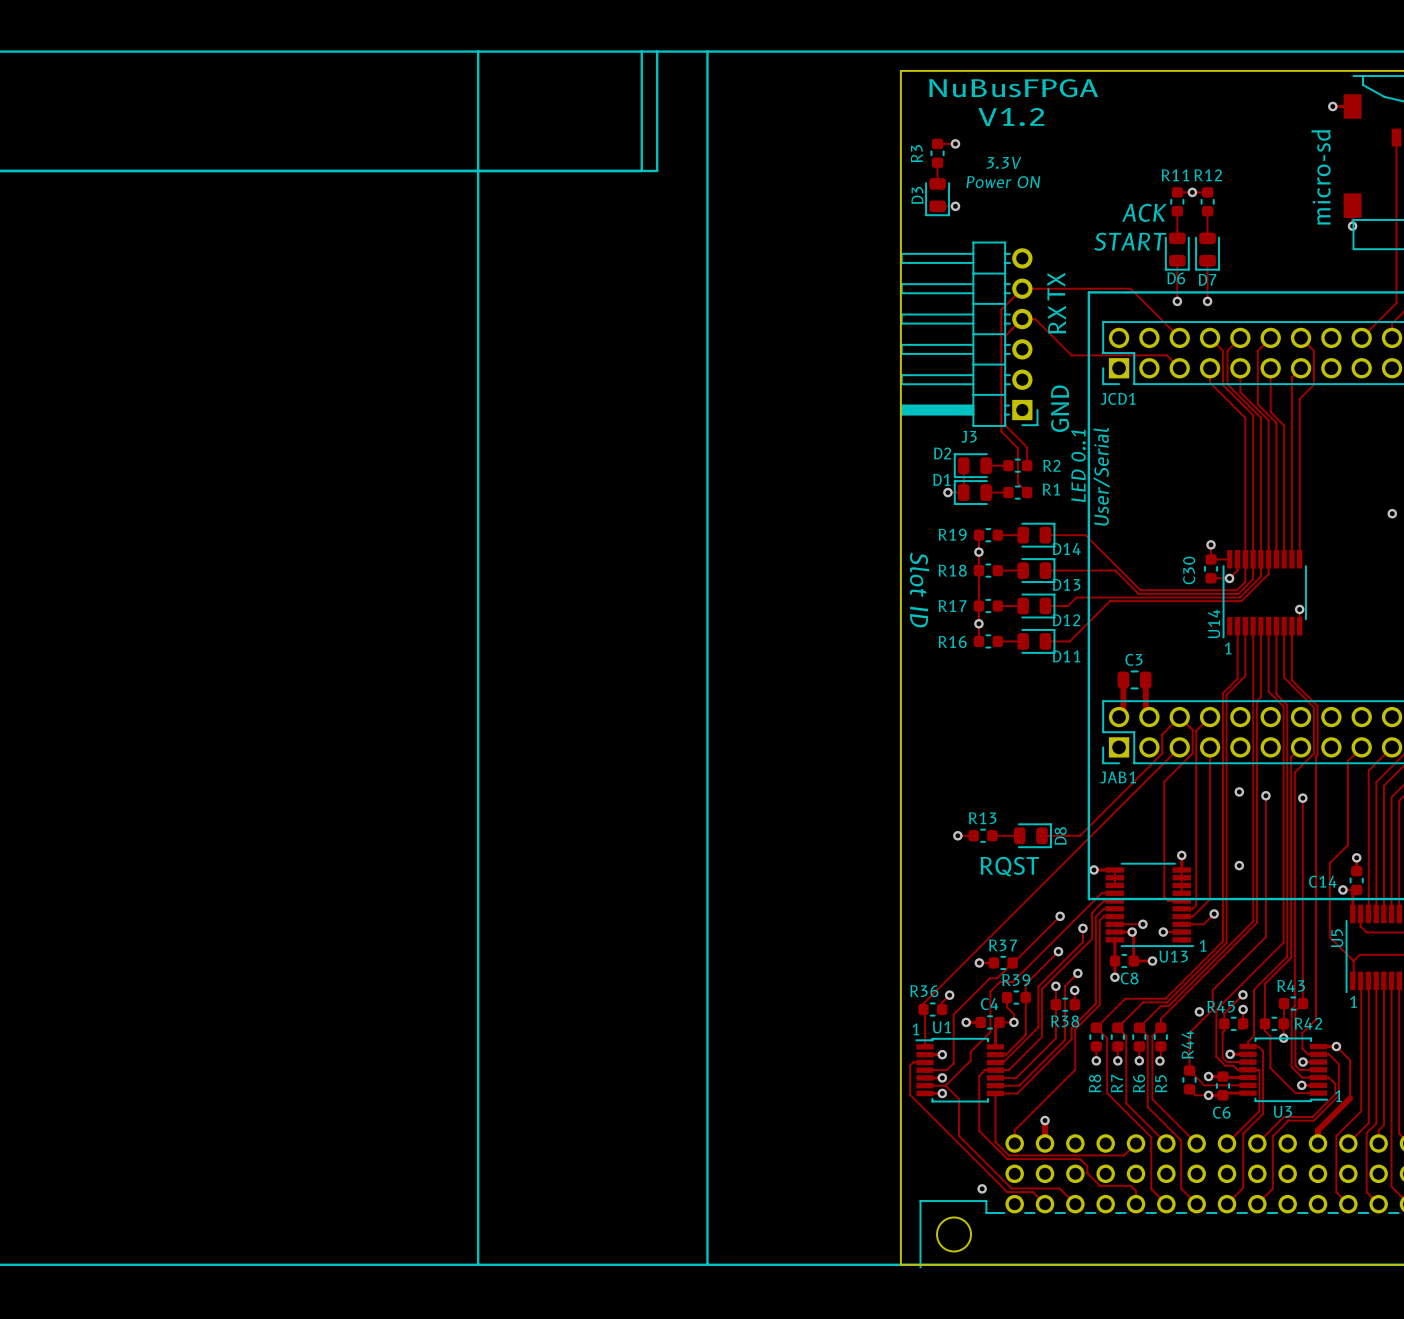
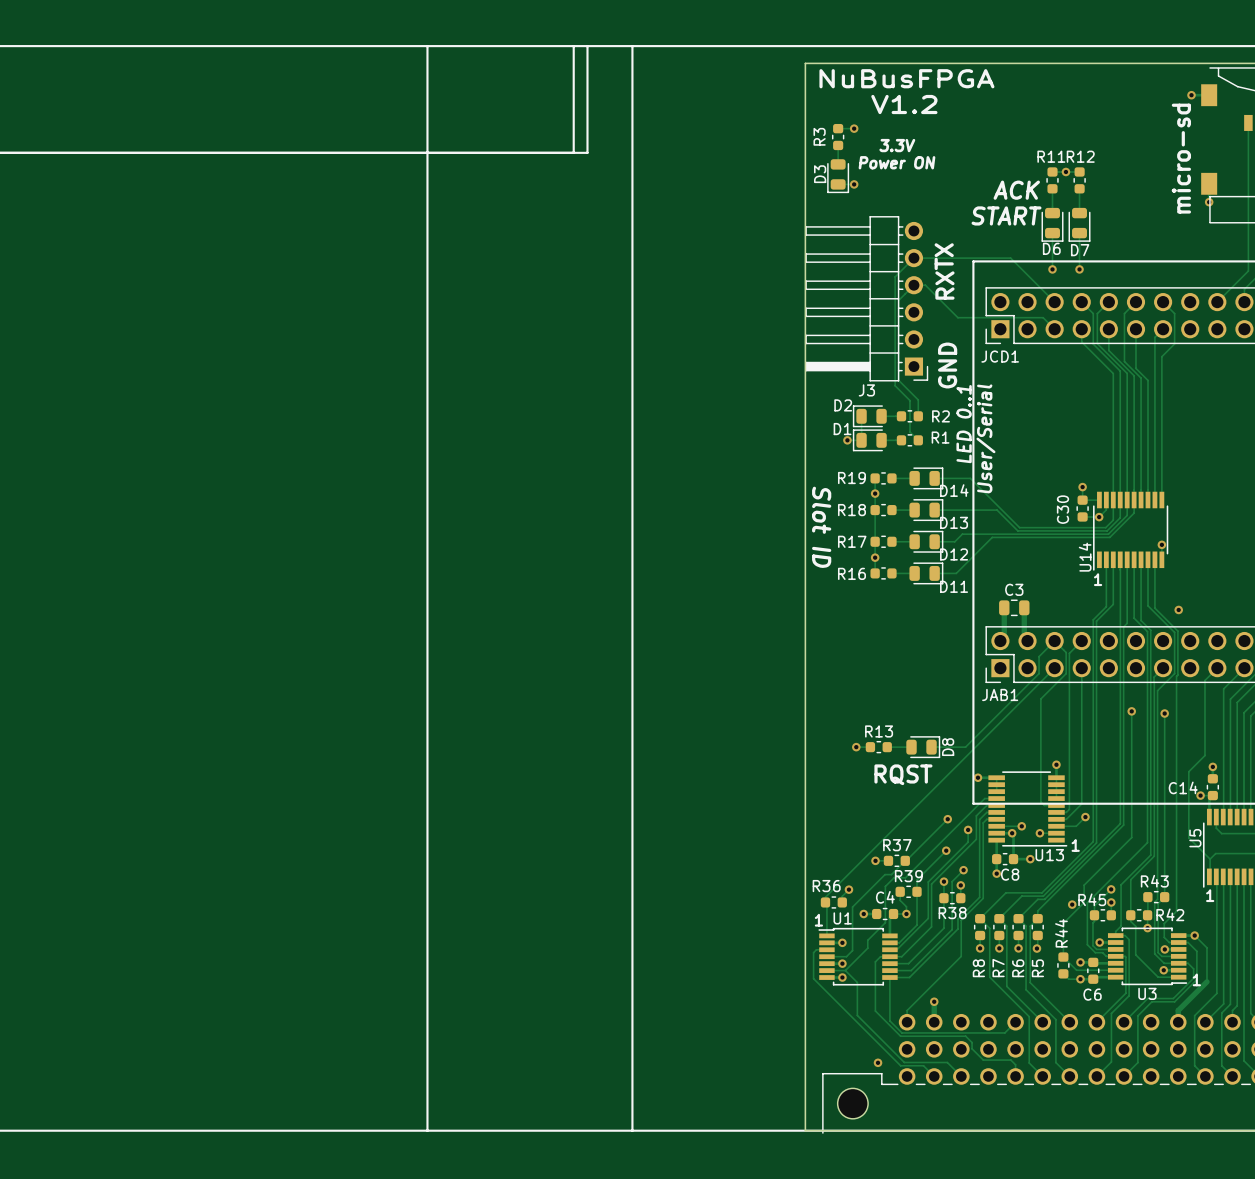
via: (1392, 513) -> none
via: none -> (1178, 609)
via: (1239, 791) -> none
via: (1239, 865) -> none

